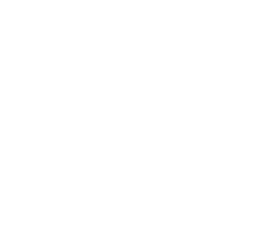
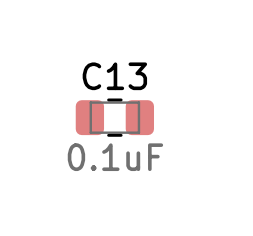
C13: none -> 0.1uF (114, 117)

